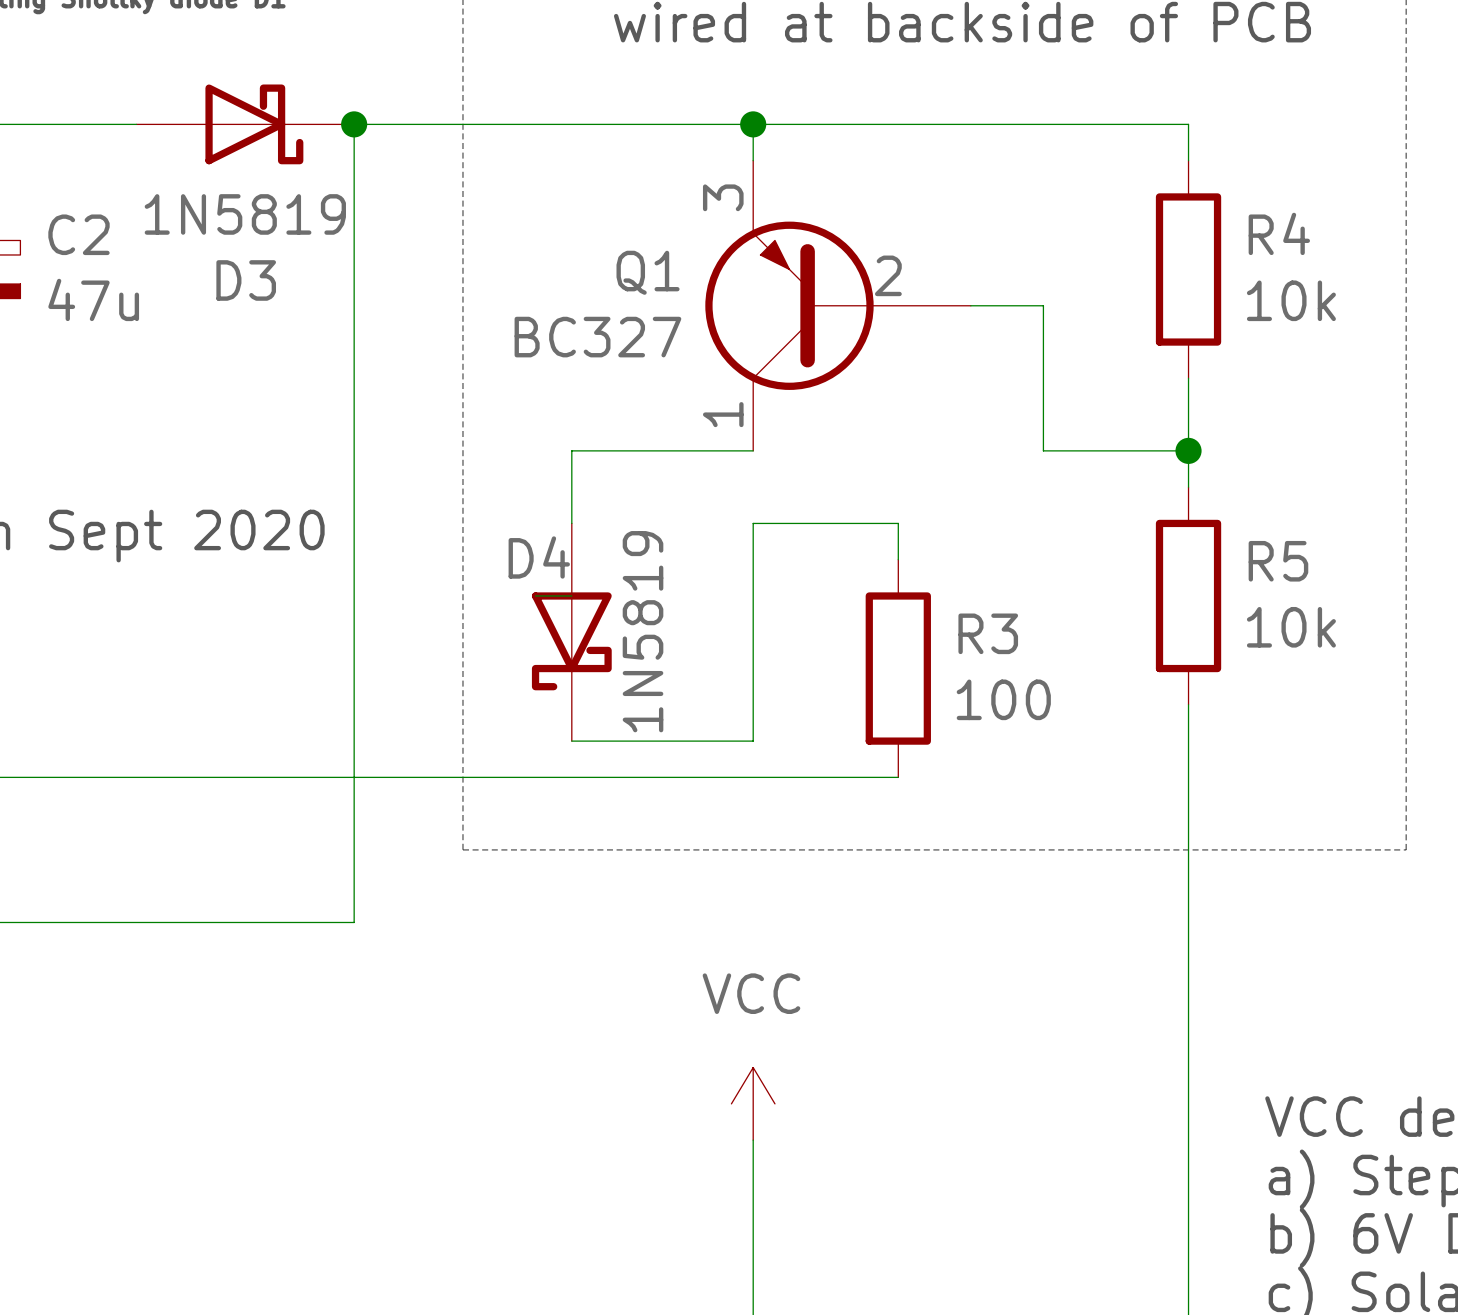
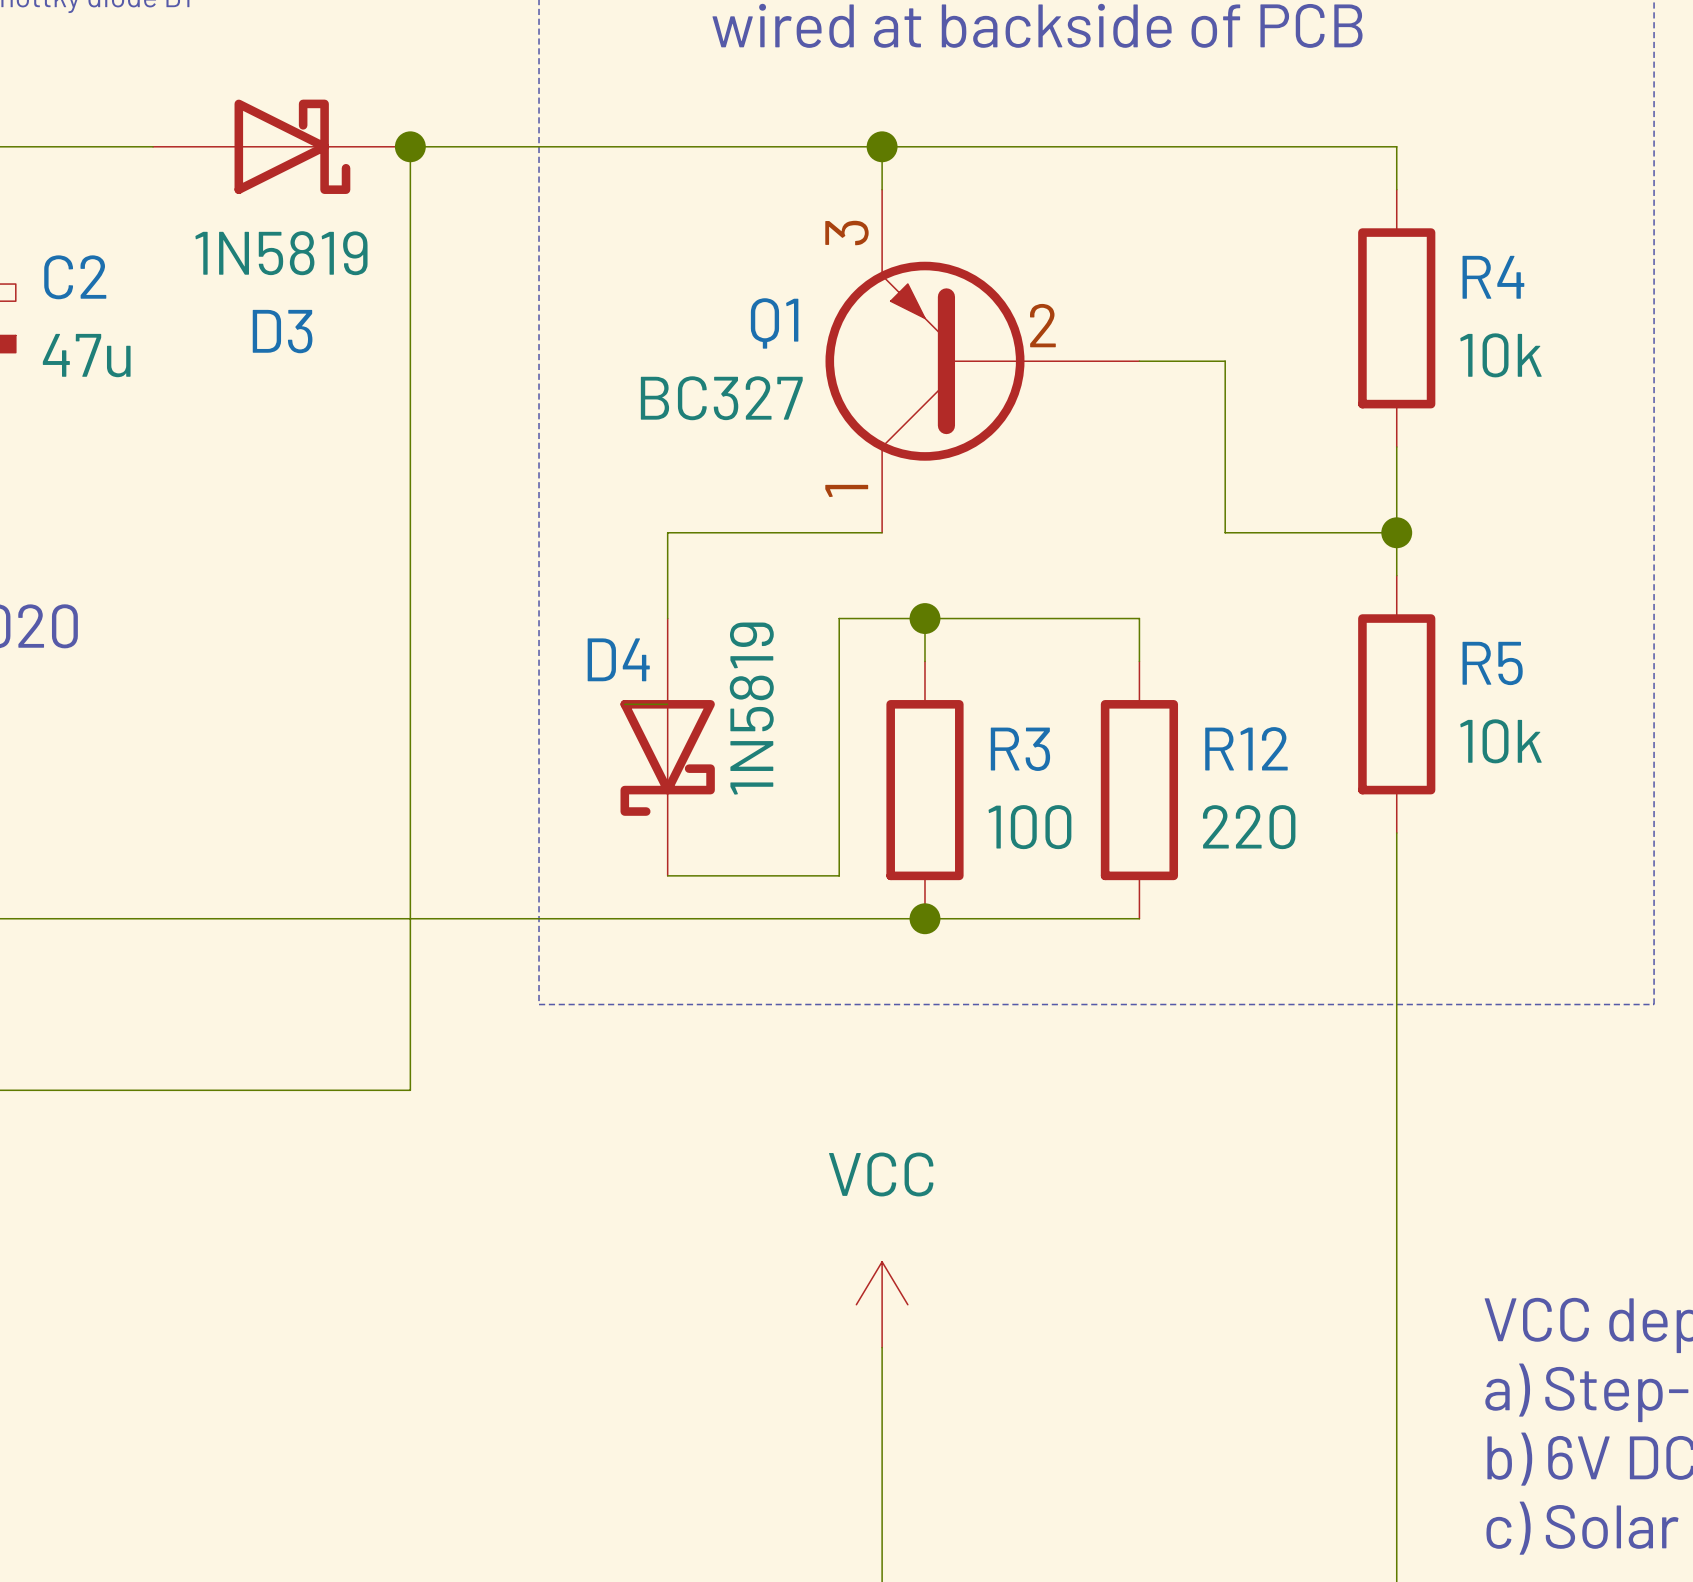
wire: (753, 523) (753, 741) (716, 741) -> (882, 618) (839, 618) (839, 875)
wire: none -> (924, 618) (924, 661)
junction: none -> (924, 618)
wire: (898, 523) (898, 559) -> (1053, 618) (1139, 618) (1139, 661)
R3 position: (898, 668) -> (924, 790)
R12: none -> 220 (1139, 790)
junction: none -> (924, 918)
wire: none -> (1053, 918) (1139, 918)

